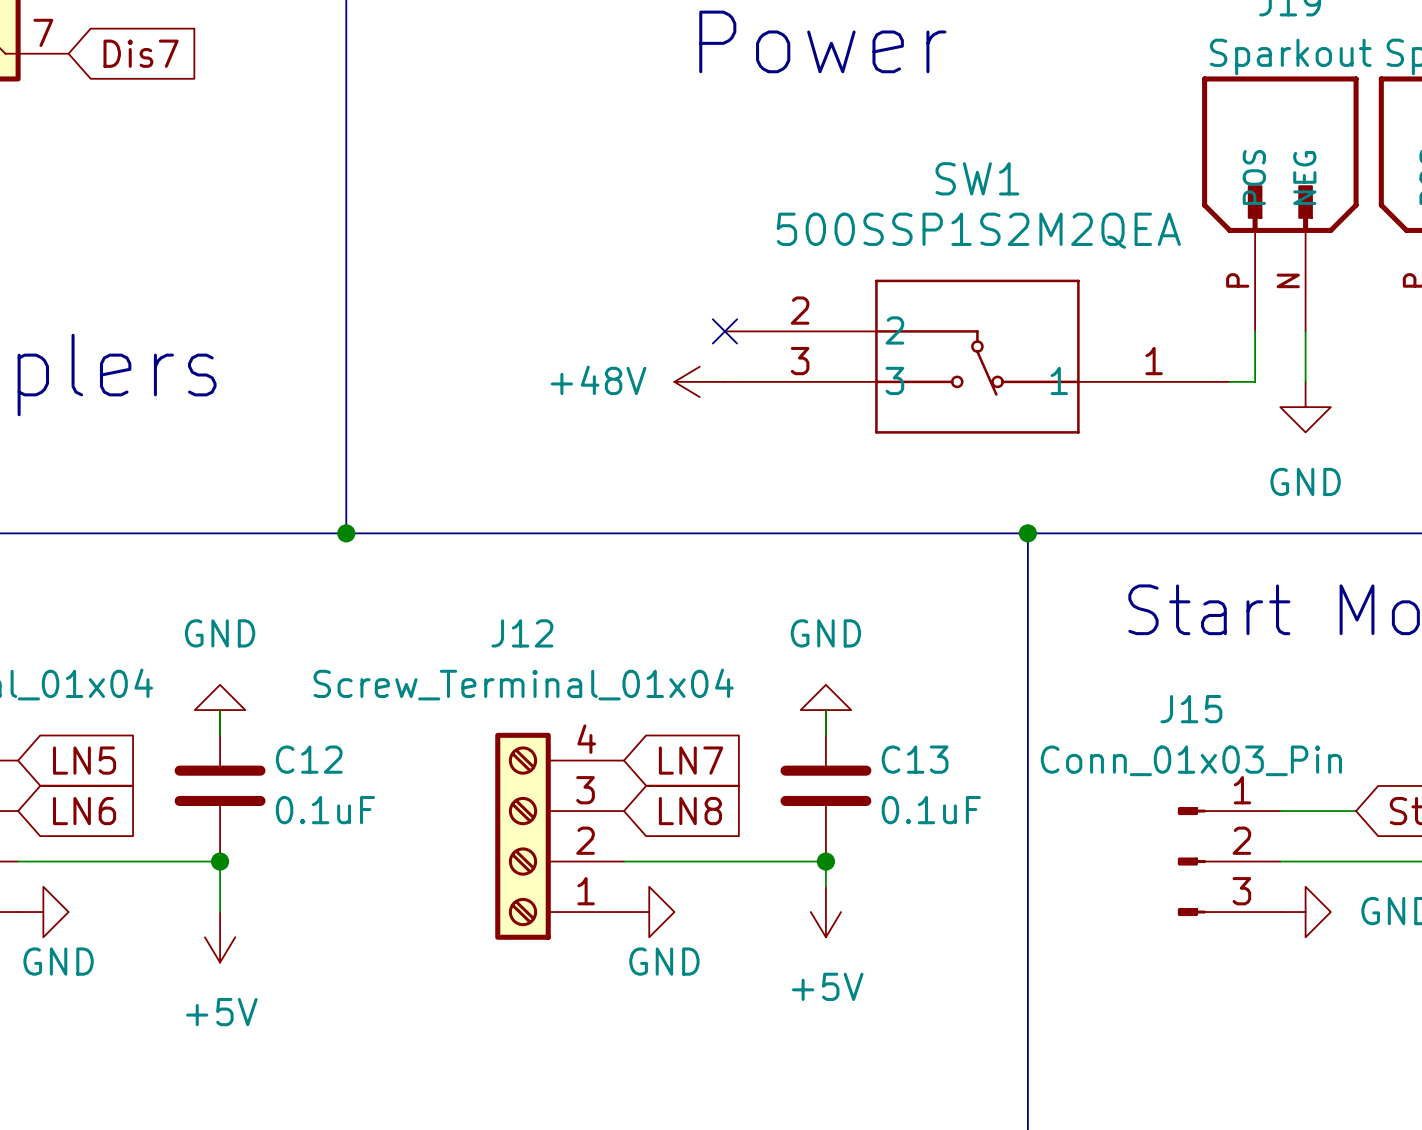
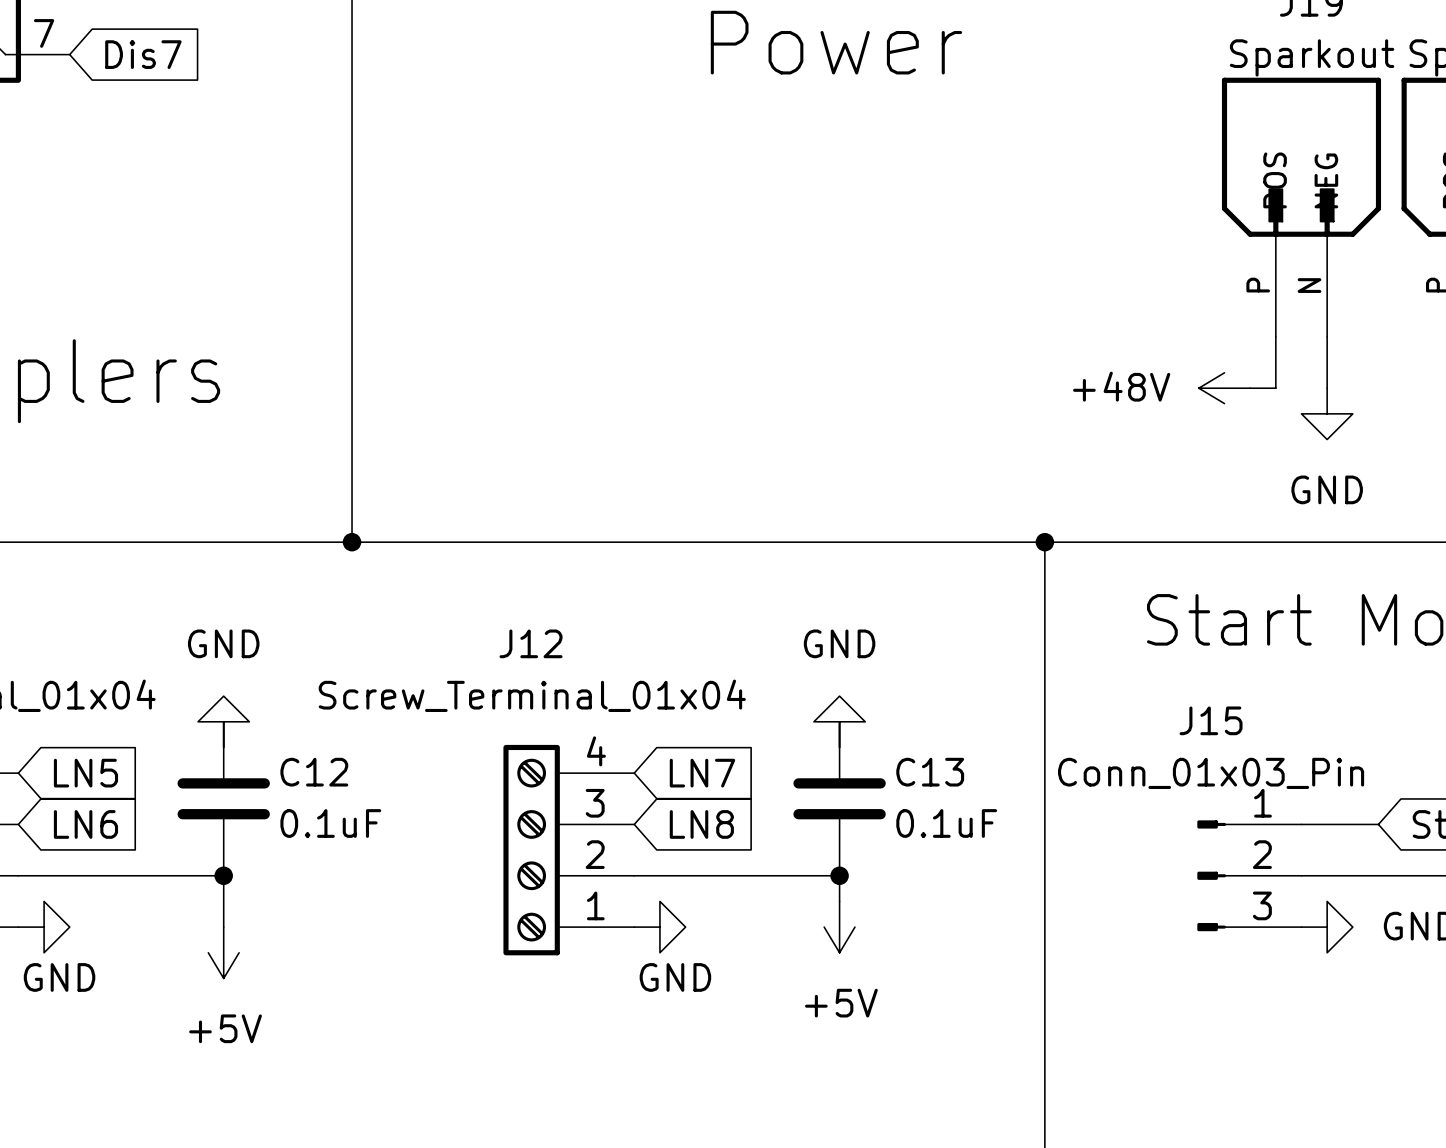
no-connect mark: (724, 331) -> none
SW1: 500SSP1S2M2QEA (977, 356) -> none
power symbol: +48V (699, 381) -> none
power symbol: none -> +48V (1224, 388)

